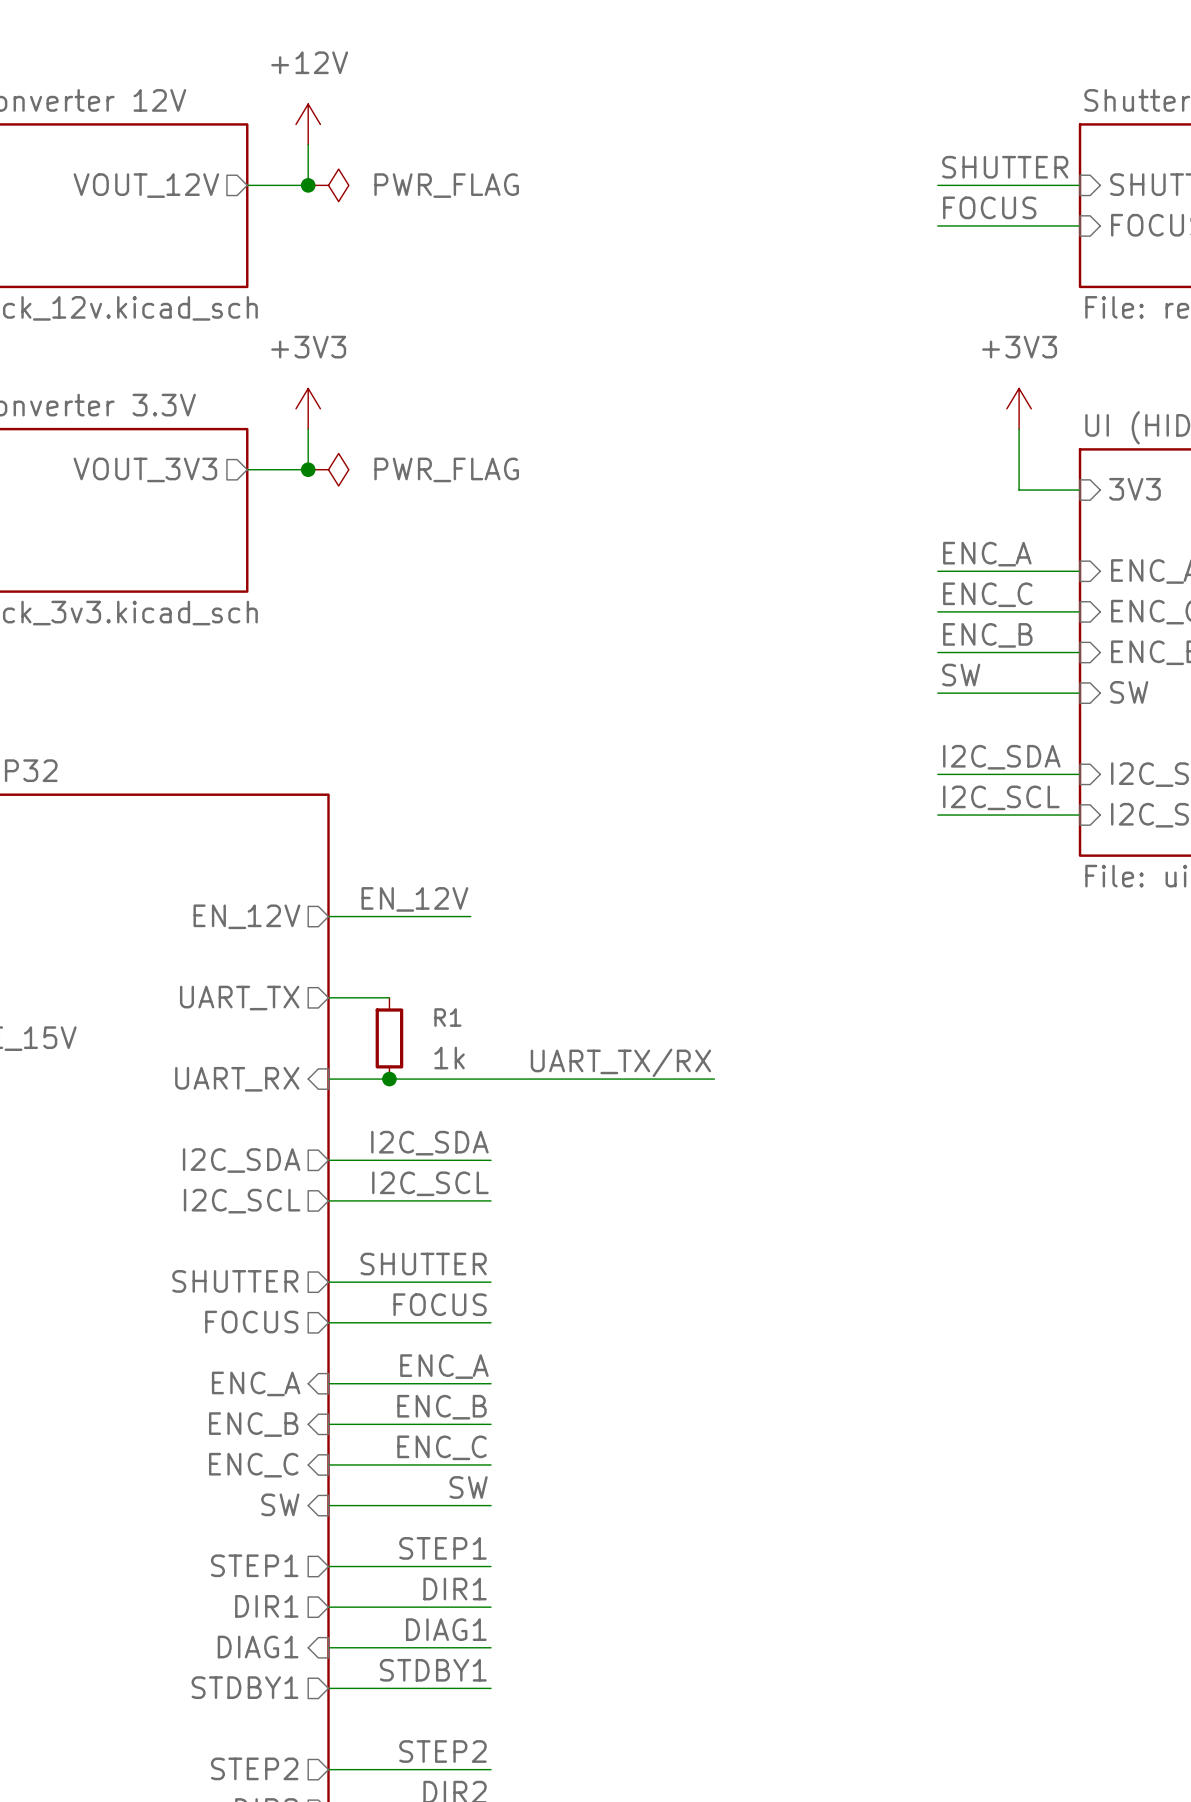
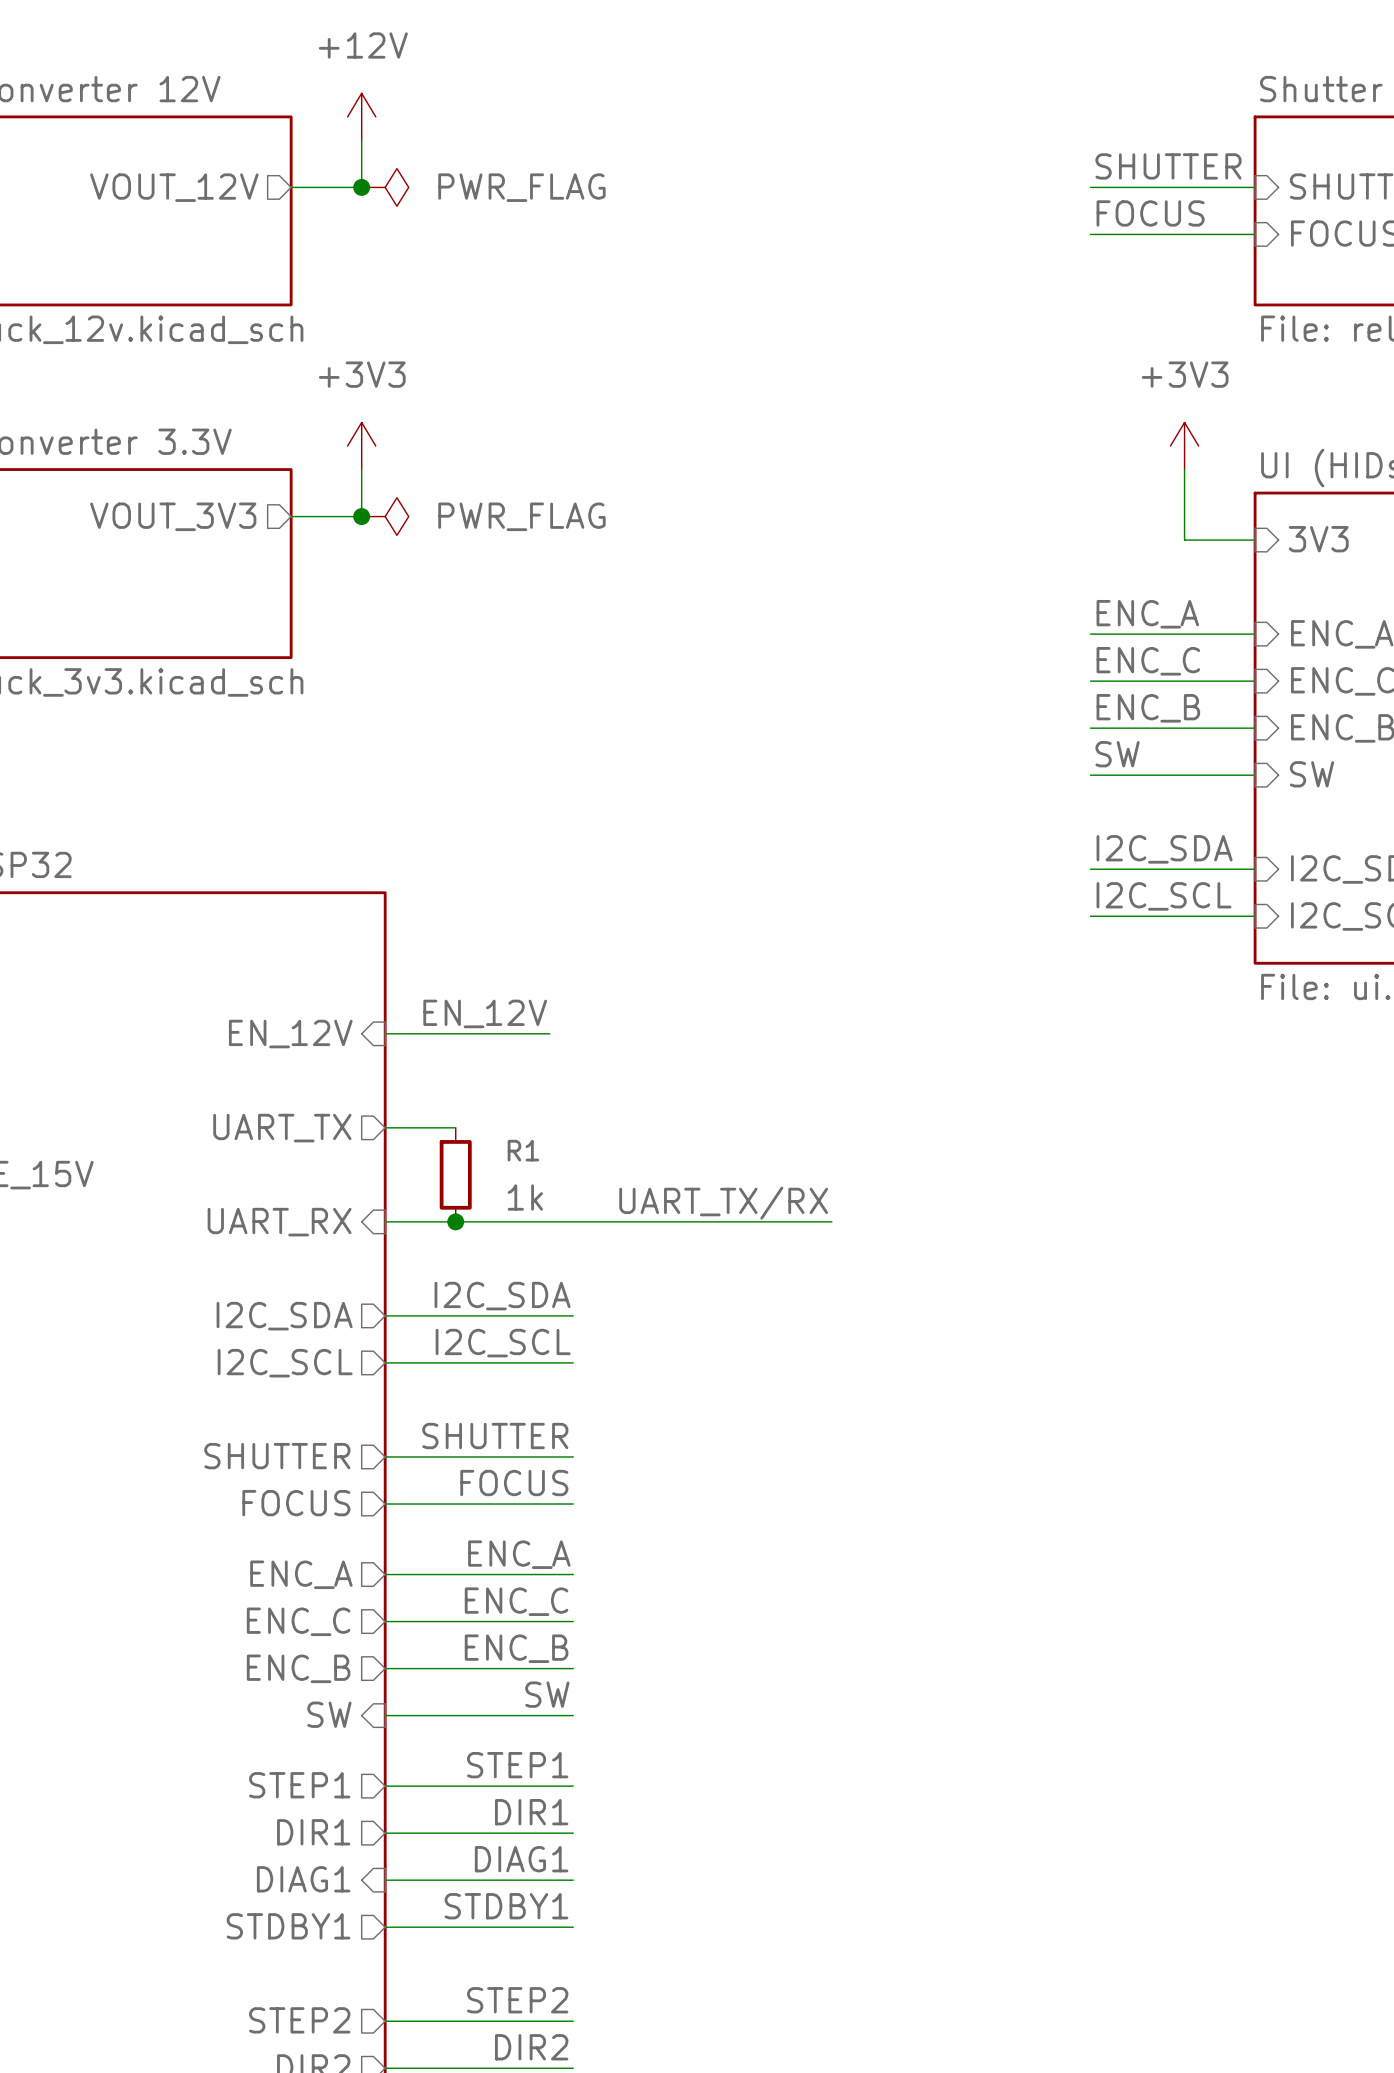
sheet pin shape: output (246, 916) -> input (290, 1034)
sheet pin shape: input (256, 1383) -> output (301, 1574)
label: ENC_B (442, 1407) -> ENC_C (516, 1601)
sheet pin shape: input (253, 1424) -> output (298, 1621)
sheet pin: ENC_B (253, 1424) -> ENC_C (298, 1621)
label: ENC_C (442, 1447) -> ENC_B (516, 1648)
sheet pin shape: input (253, 1465) -> output (298, 1668)
sheet pin: ENC_C (253, 1465) -> ENC_B (298, 1668)

